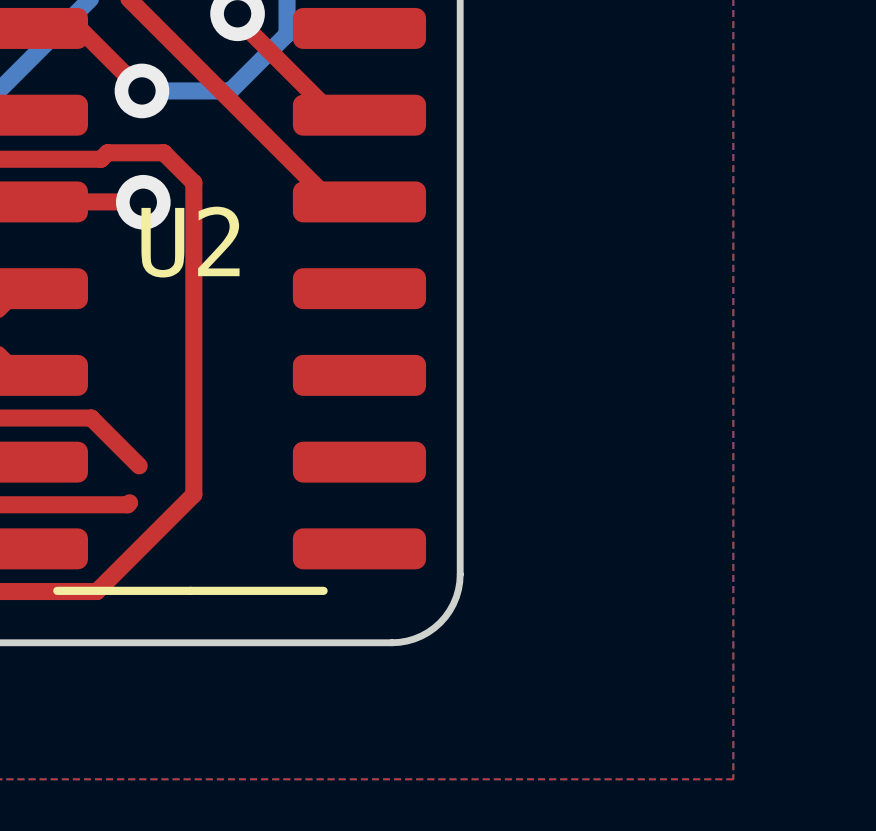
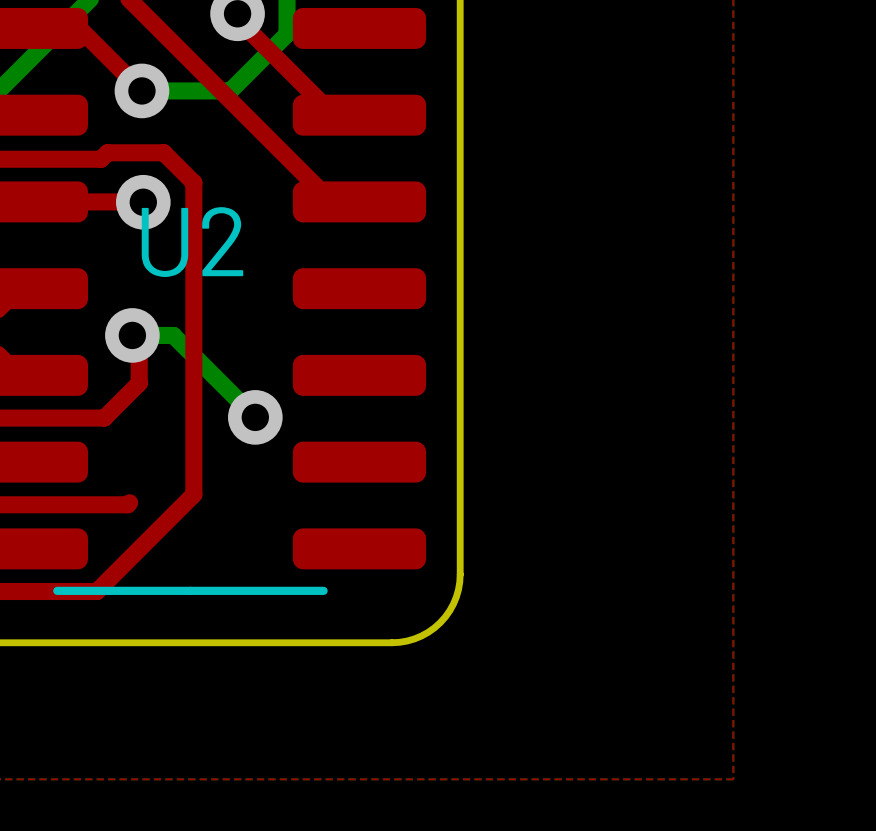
bottom track: none -> (132, 335) (173, 335) (255, 417)
via: none -> (132, 335)
via: none -> (255, 417)
top track: (91, 418) (139, 465) -> (91, 418) (104, 418) (139, 383) (139, 342) (132, 335)

